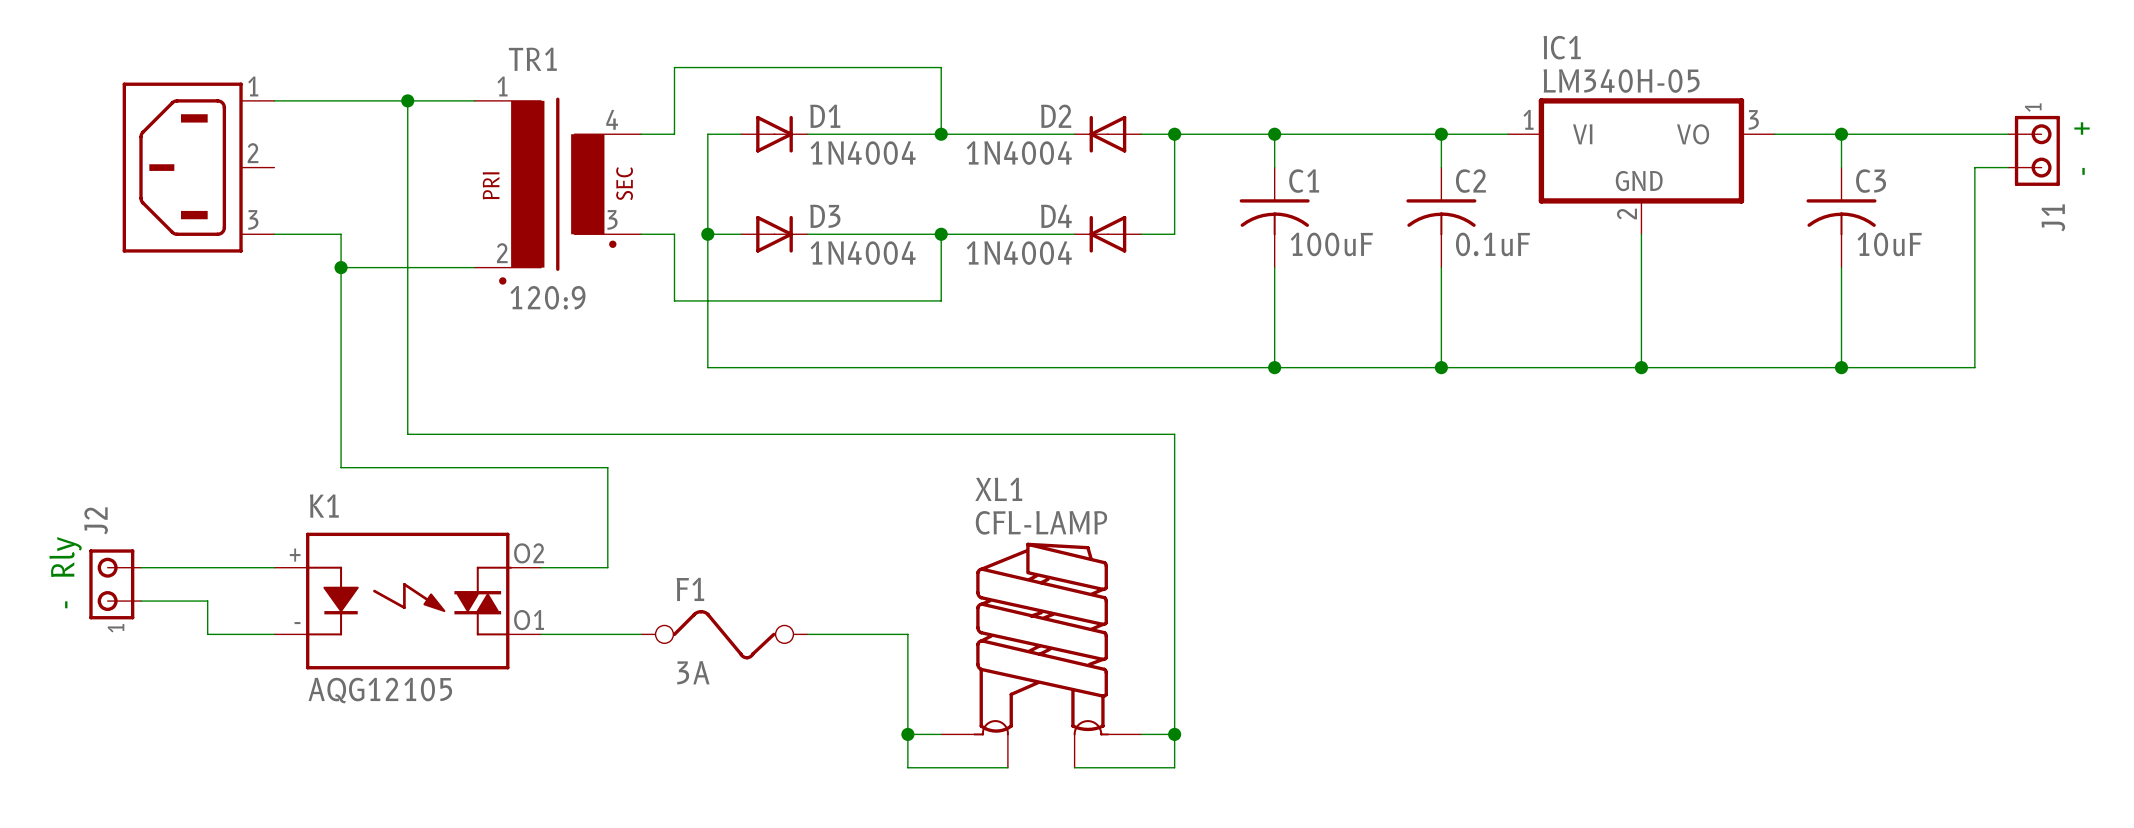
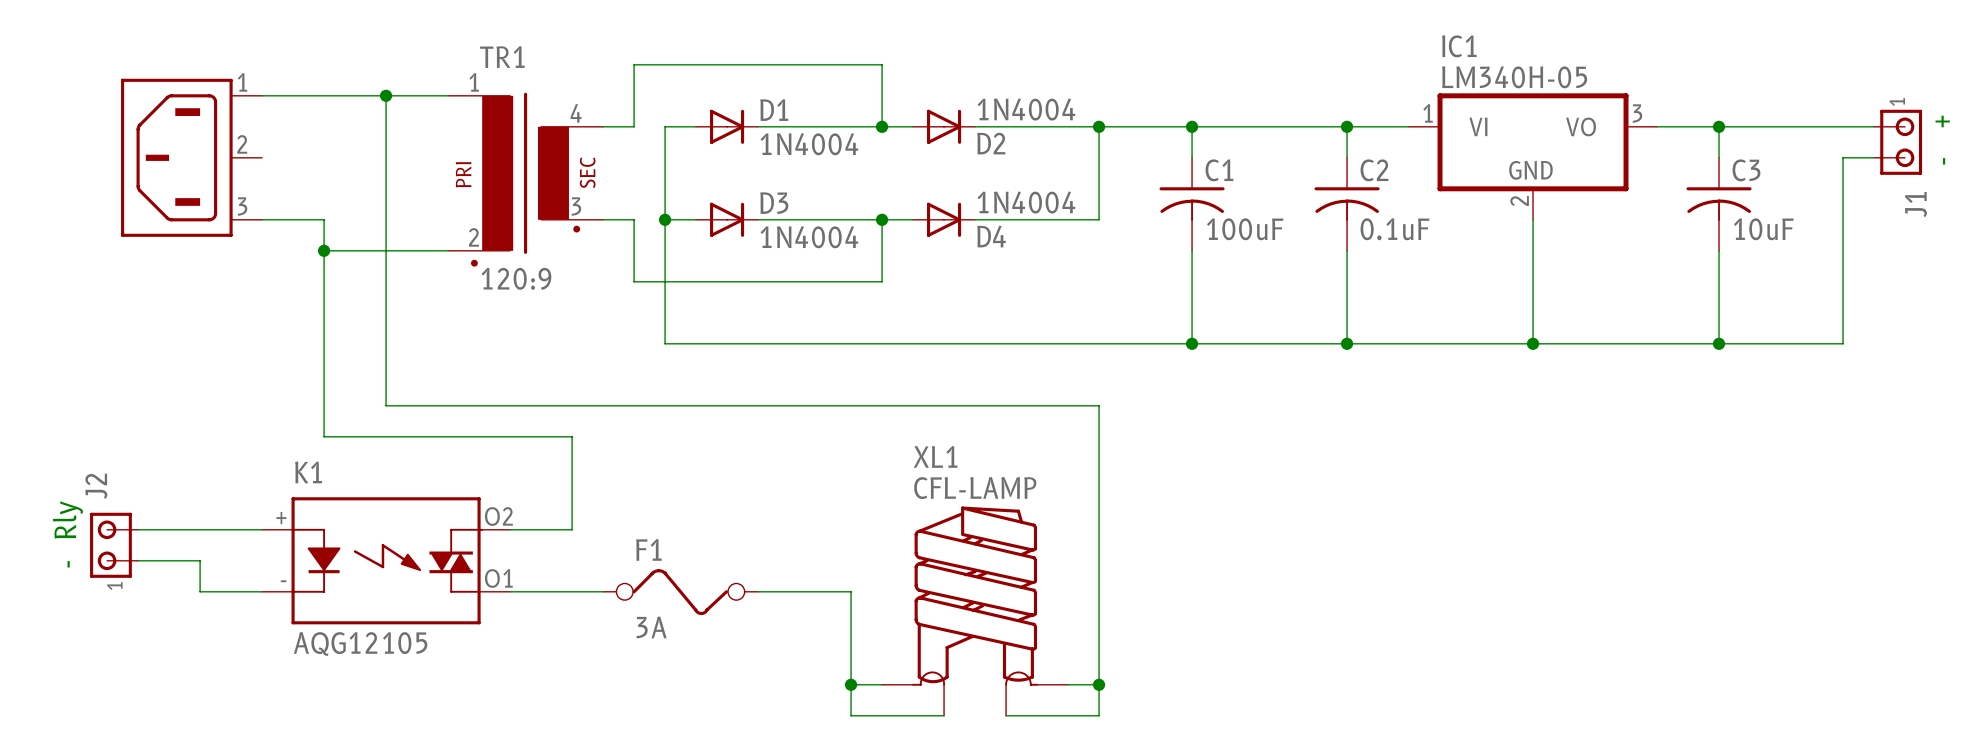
D2 rotation: 0° (1107, 134) -> 180° (944, 126)
D2 position: (1107, 134) -> (944, 126)
D4 rotation: 0° (1107, 234) -> 180° (944, 219)
D4 position: (1107, 234) -> (944, 219)

